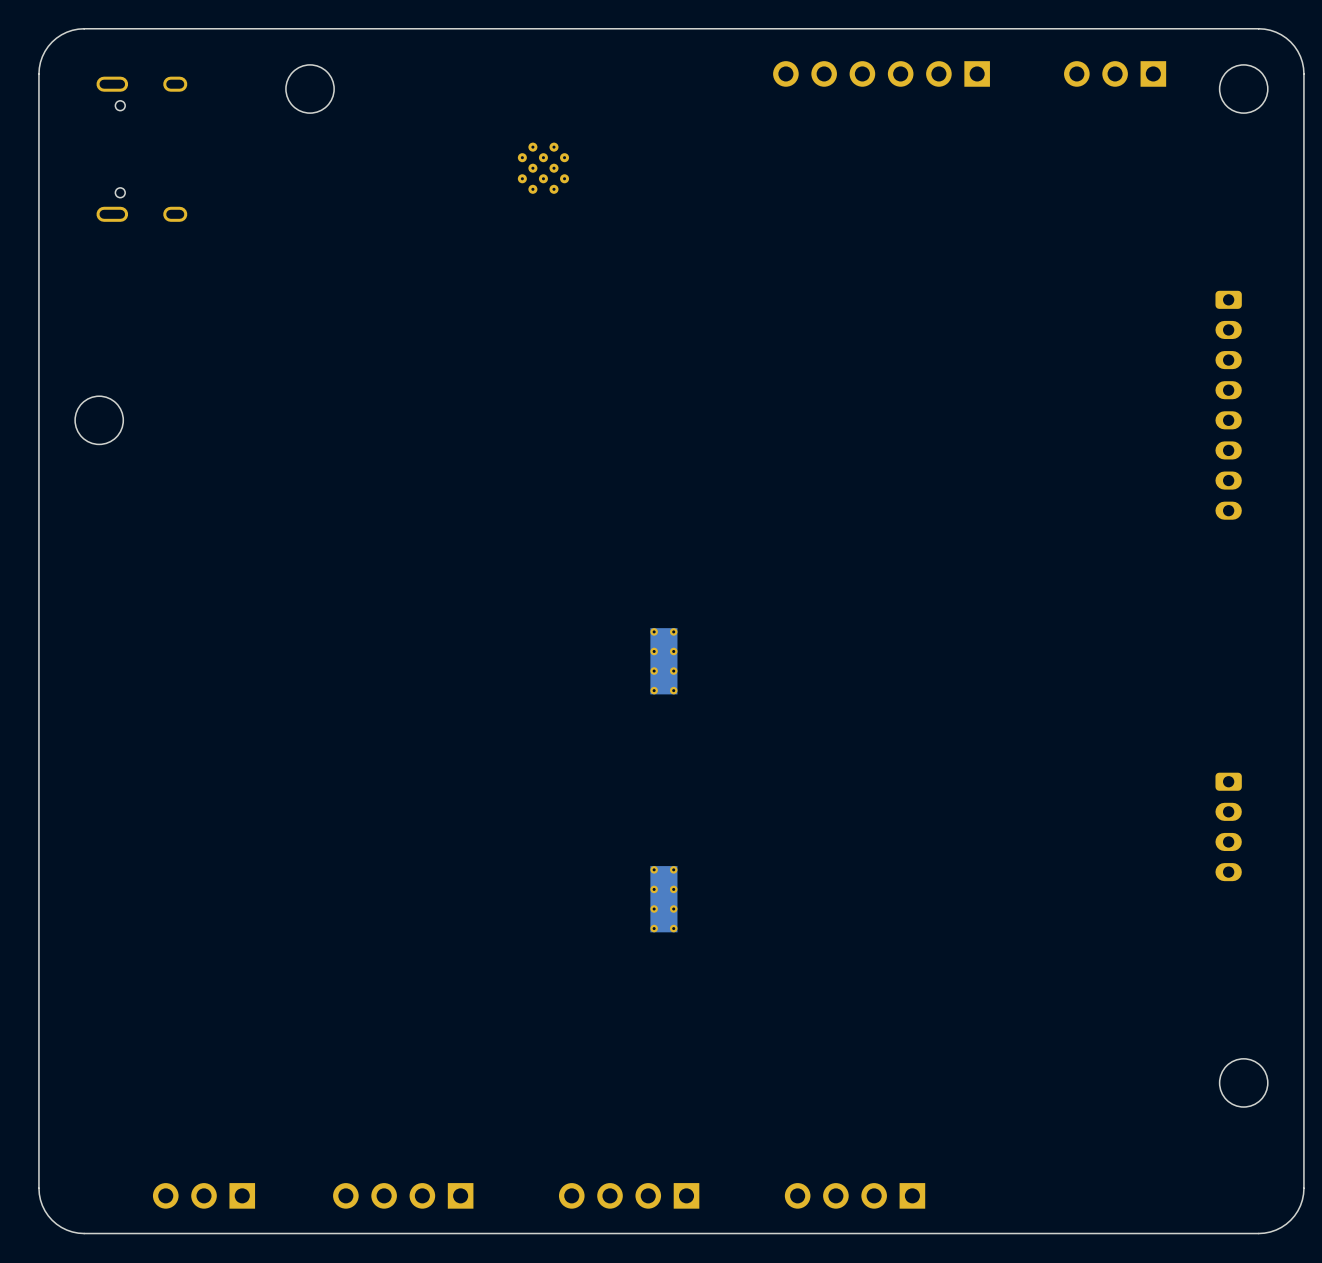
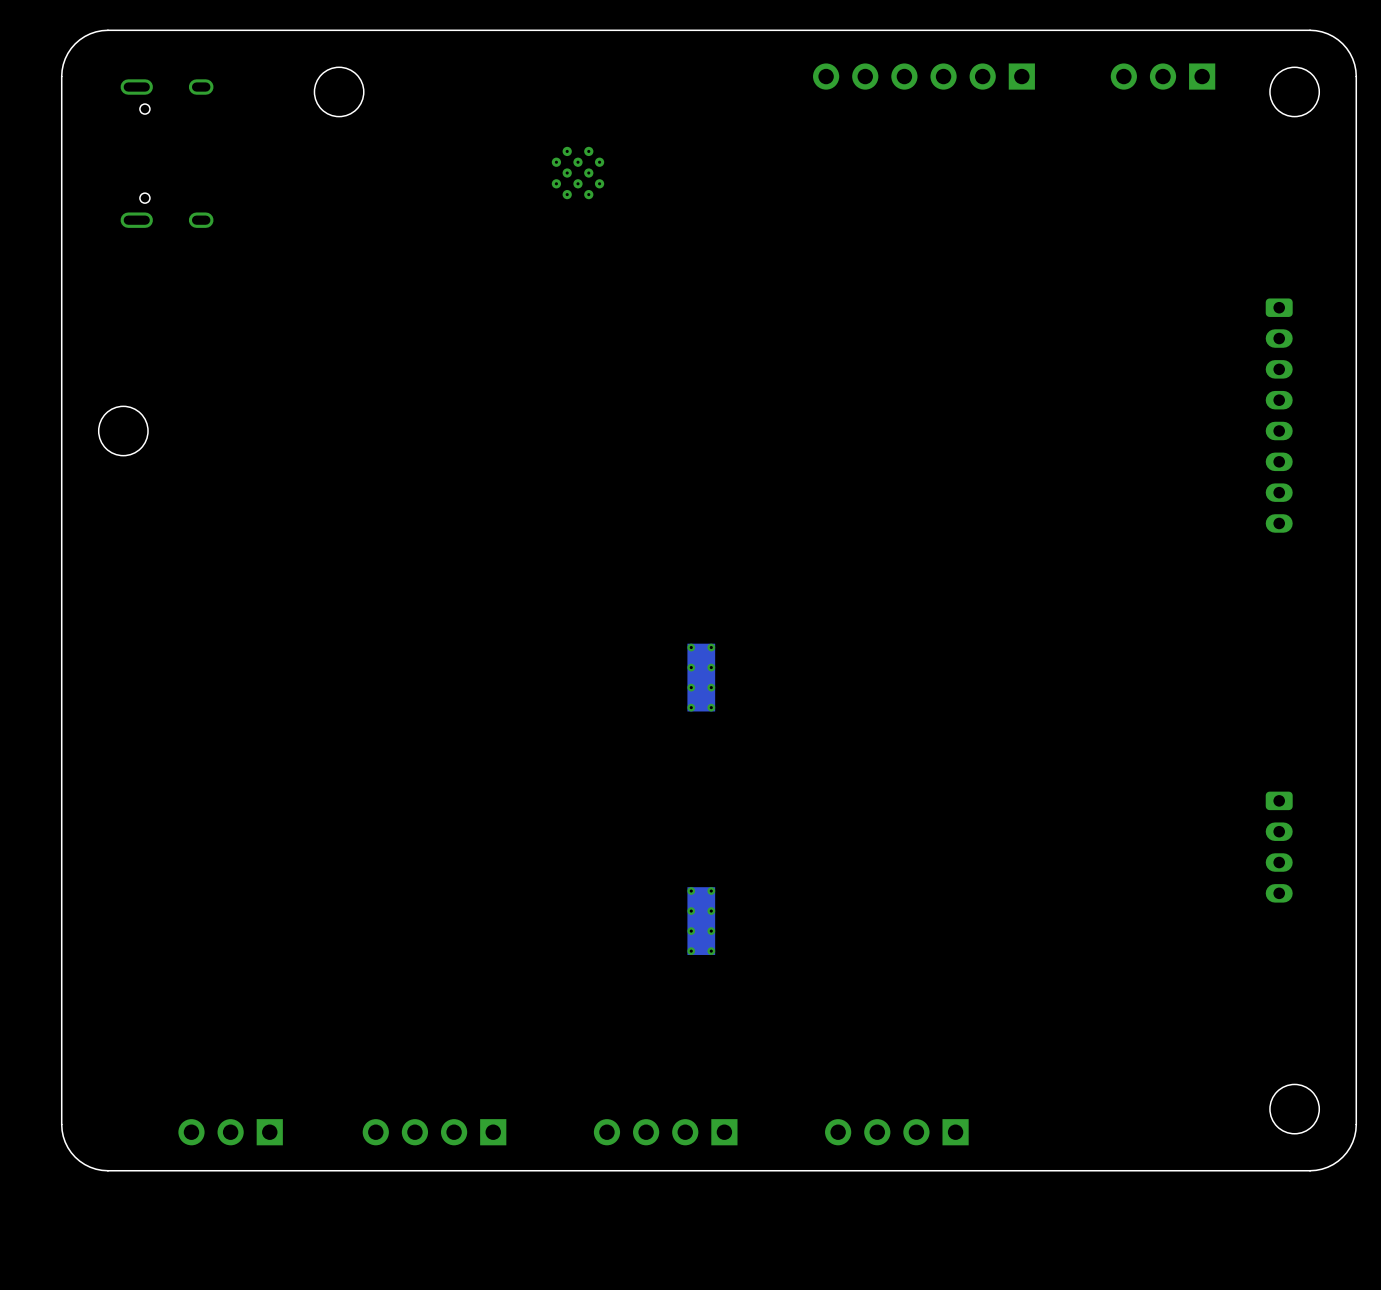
board edge: (1303, 1097) (1302, 1200) (1294, 1215) (1286, 1224) (1276, 1230) (1258, 1233) (78, 1233) (66, 1230) (56, 1224) (48, 1215) (40, 1200) (38, 1097) -> (1356, 1124) (1352, 1142) (1342, 1157) (1327, 1167) (1310, 1170) (107, 1170) (90, 1167) (75, 1157) (65, 1142) (61, 1124)
part position: (204, 1195) -> (230, 1132)
part position: (403, 1195) -> (434, 1132)
part position: (629, 1195) -> (665, 1132)
part position: (855, 1195) -> (896, 1132)

